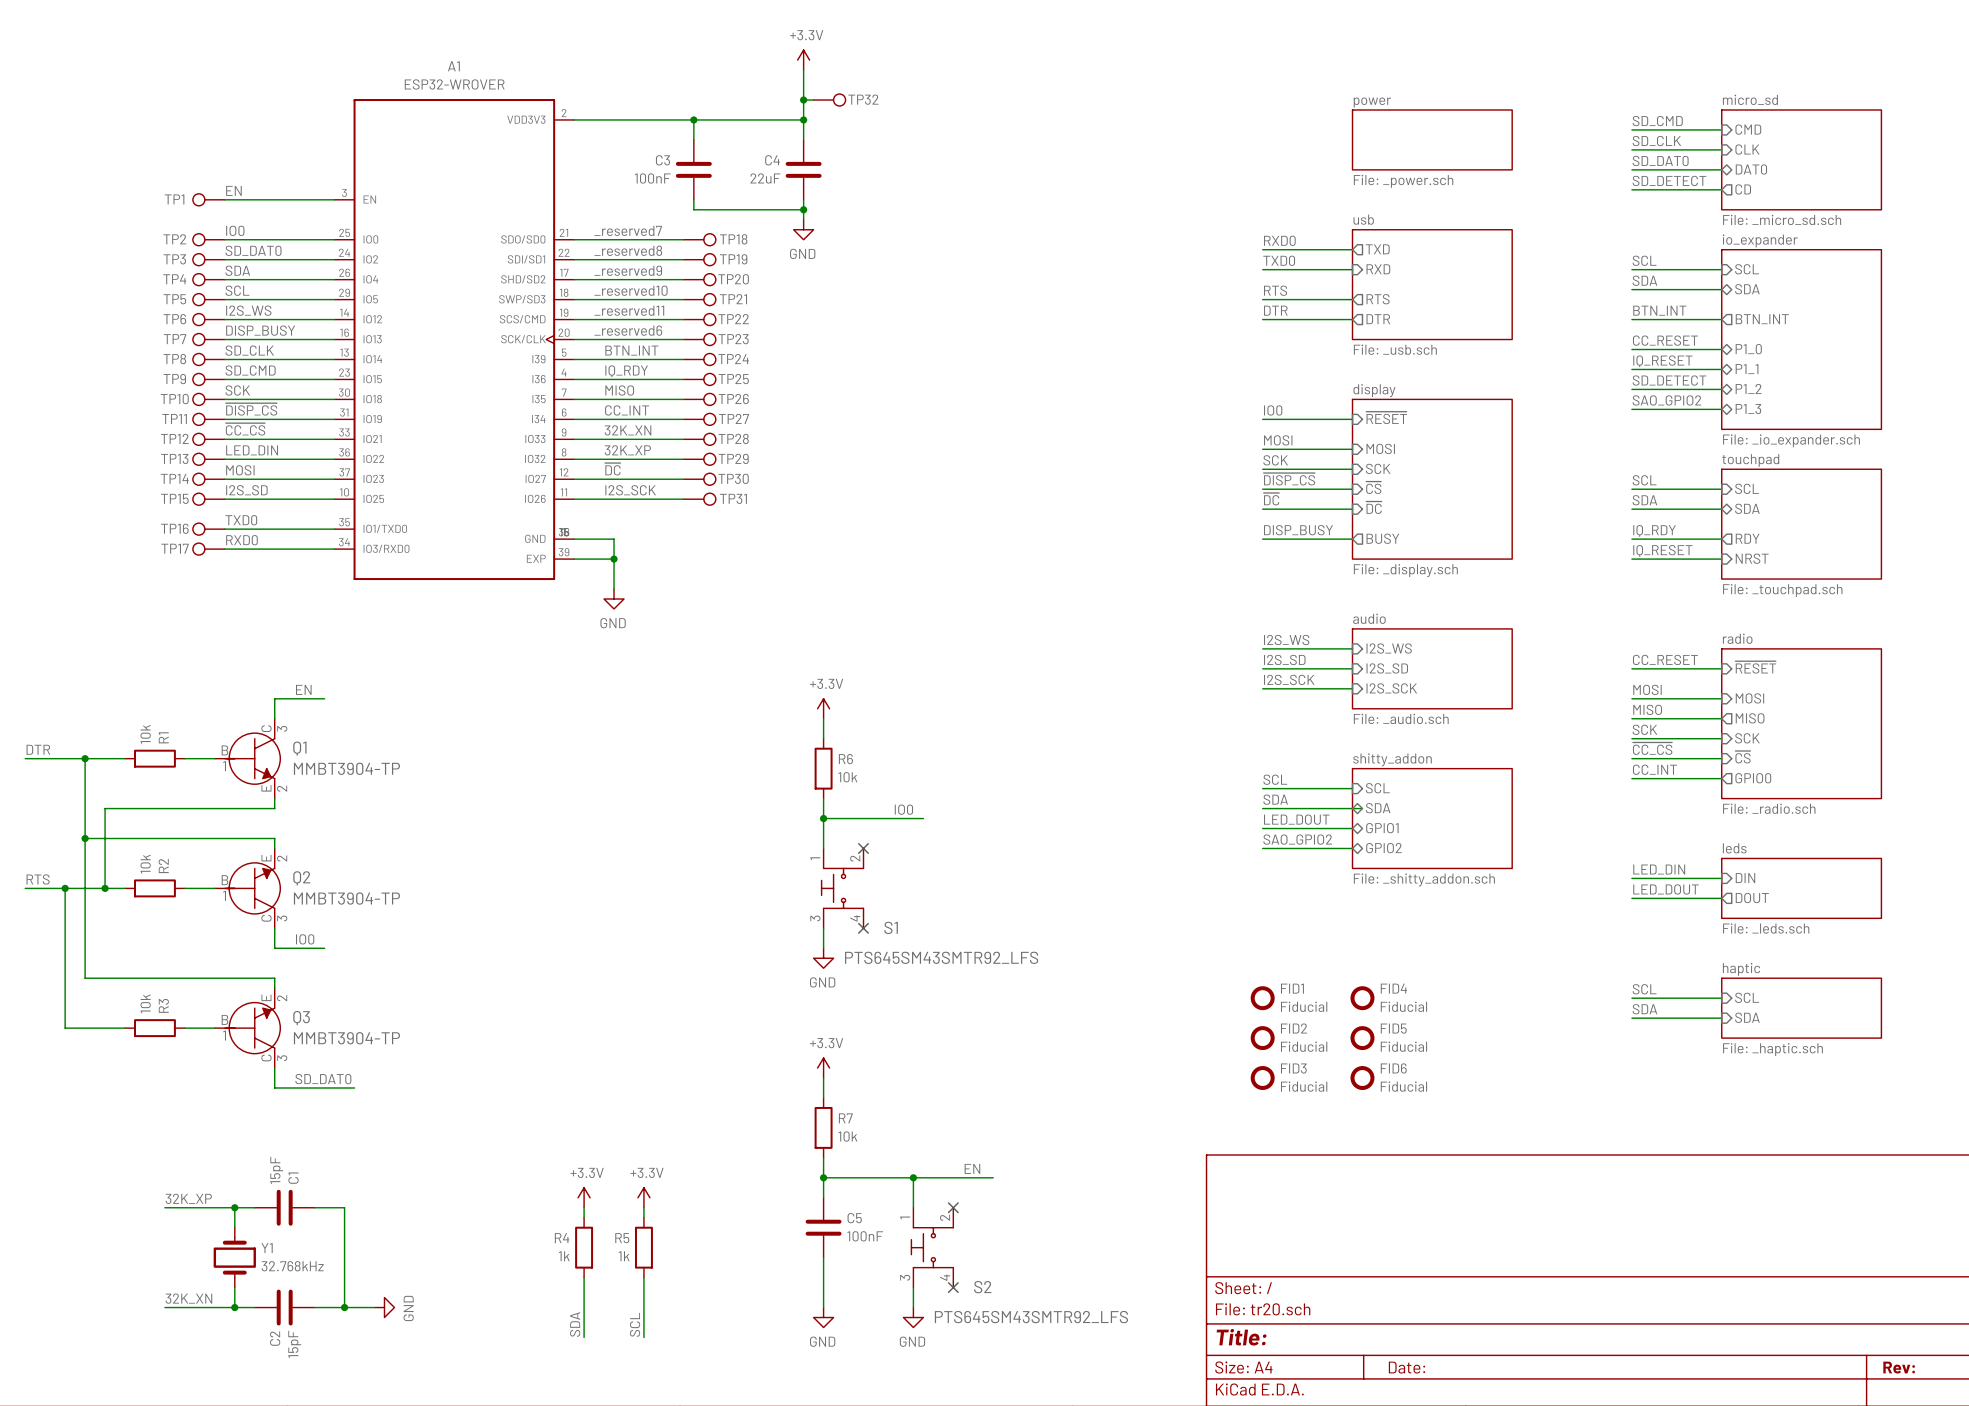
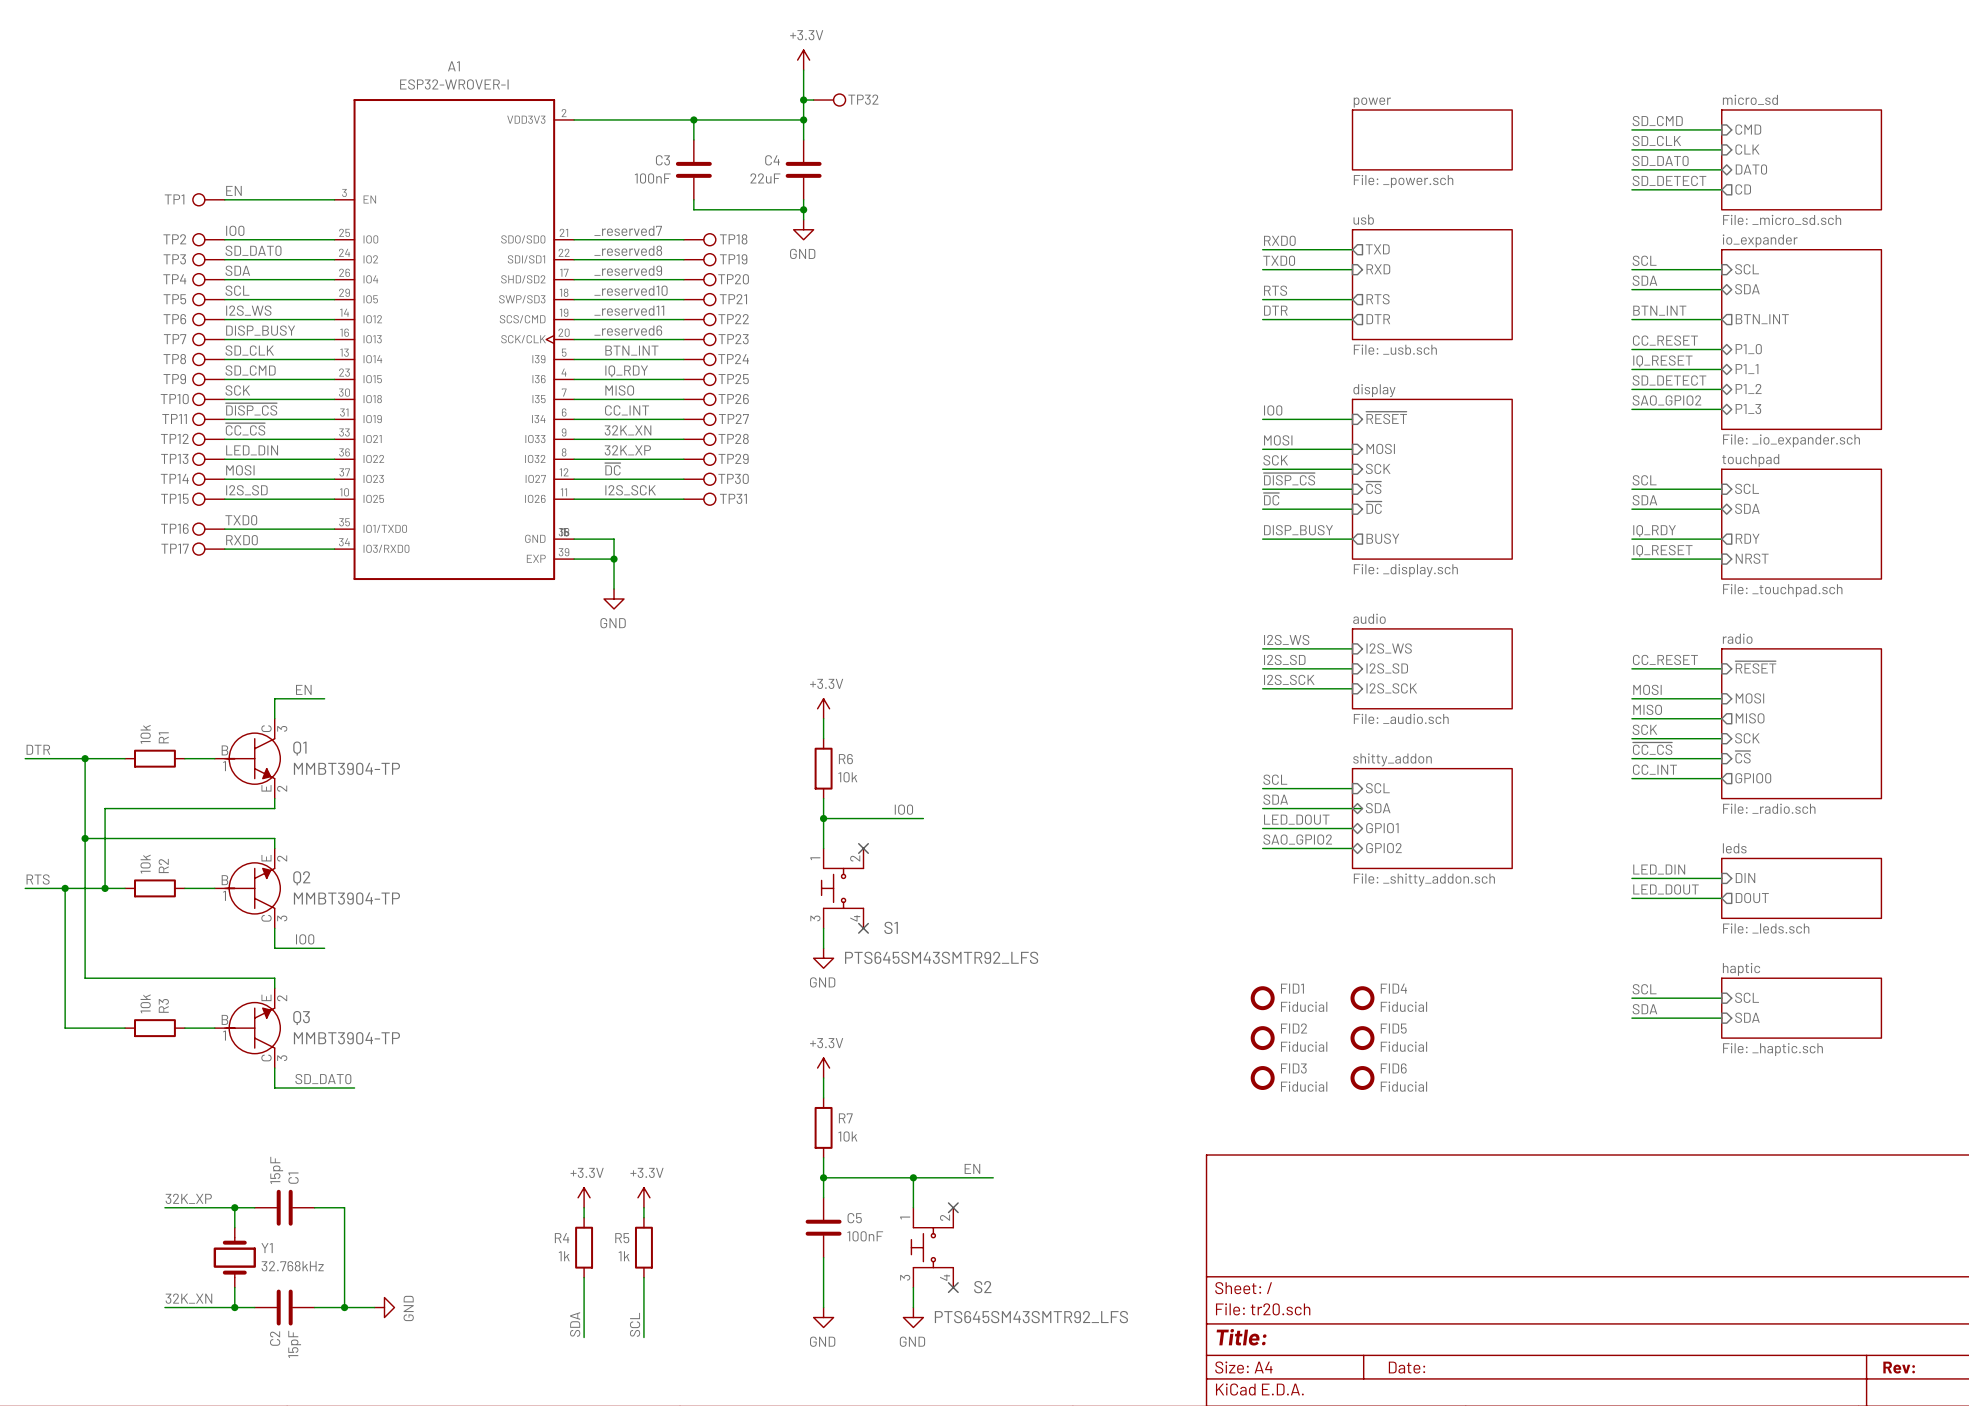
A1 value: ESP32-WROVER (454, 84) -> ESP32-WROVER-I (454, 84)

